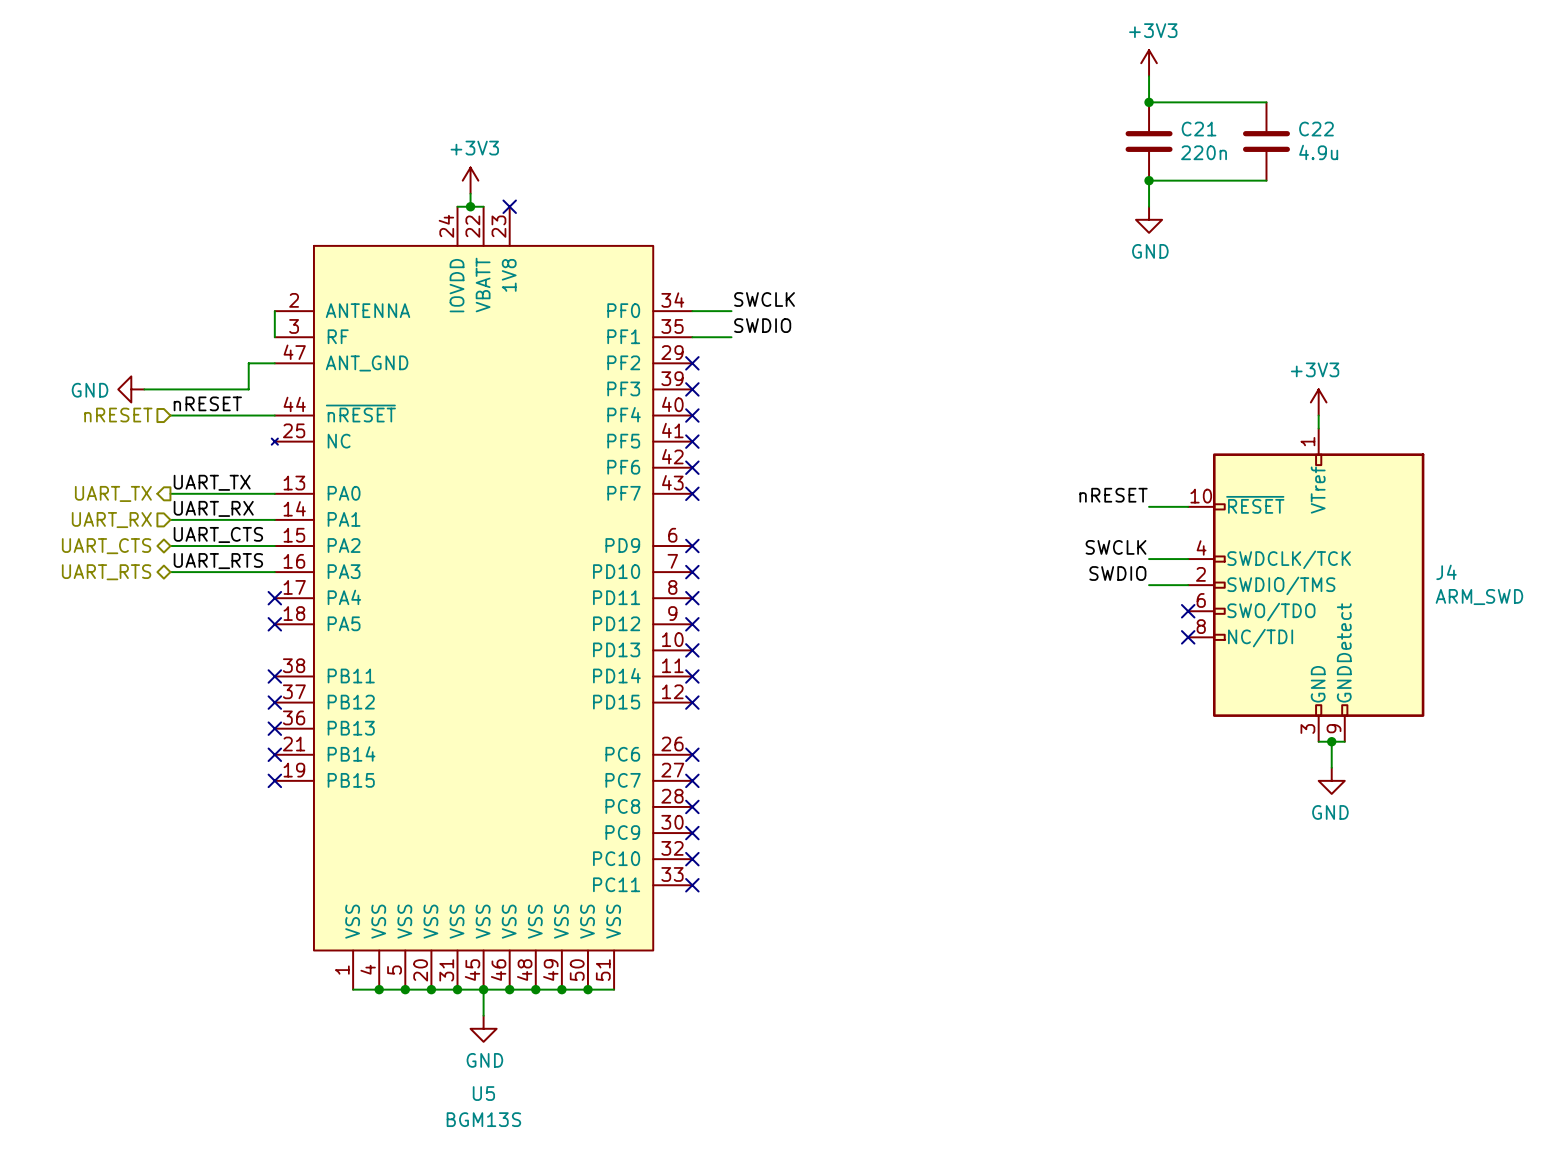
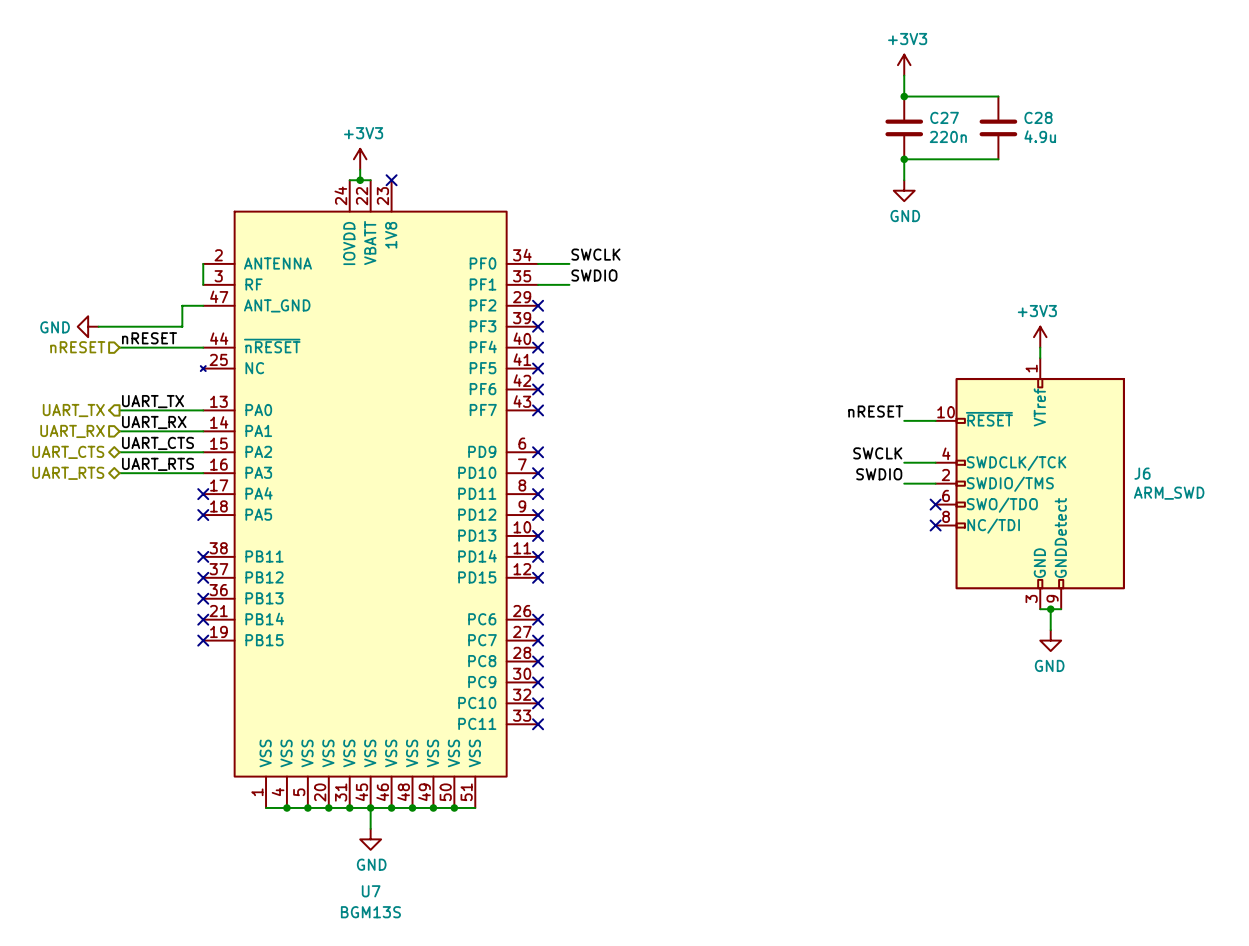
C21 name: C21 (1199, 129) -> C27 (944, 117)
C22 name: C22 (1316, 129) -> C28 (1038, 117)
J4 name: J4 (1446, 572) -> J6 (1142, 473)
U5 name: U5 (483, 1093) -> U7 (371, 891)

